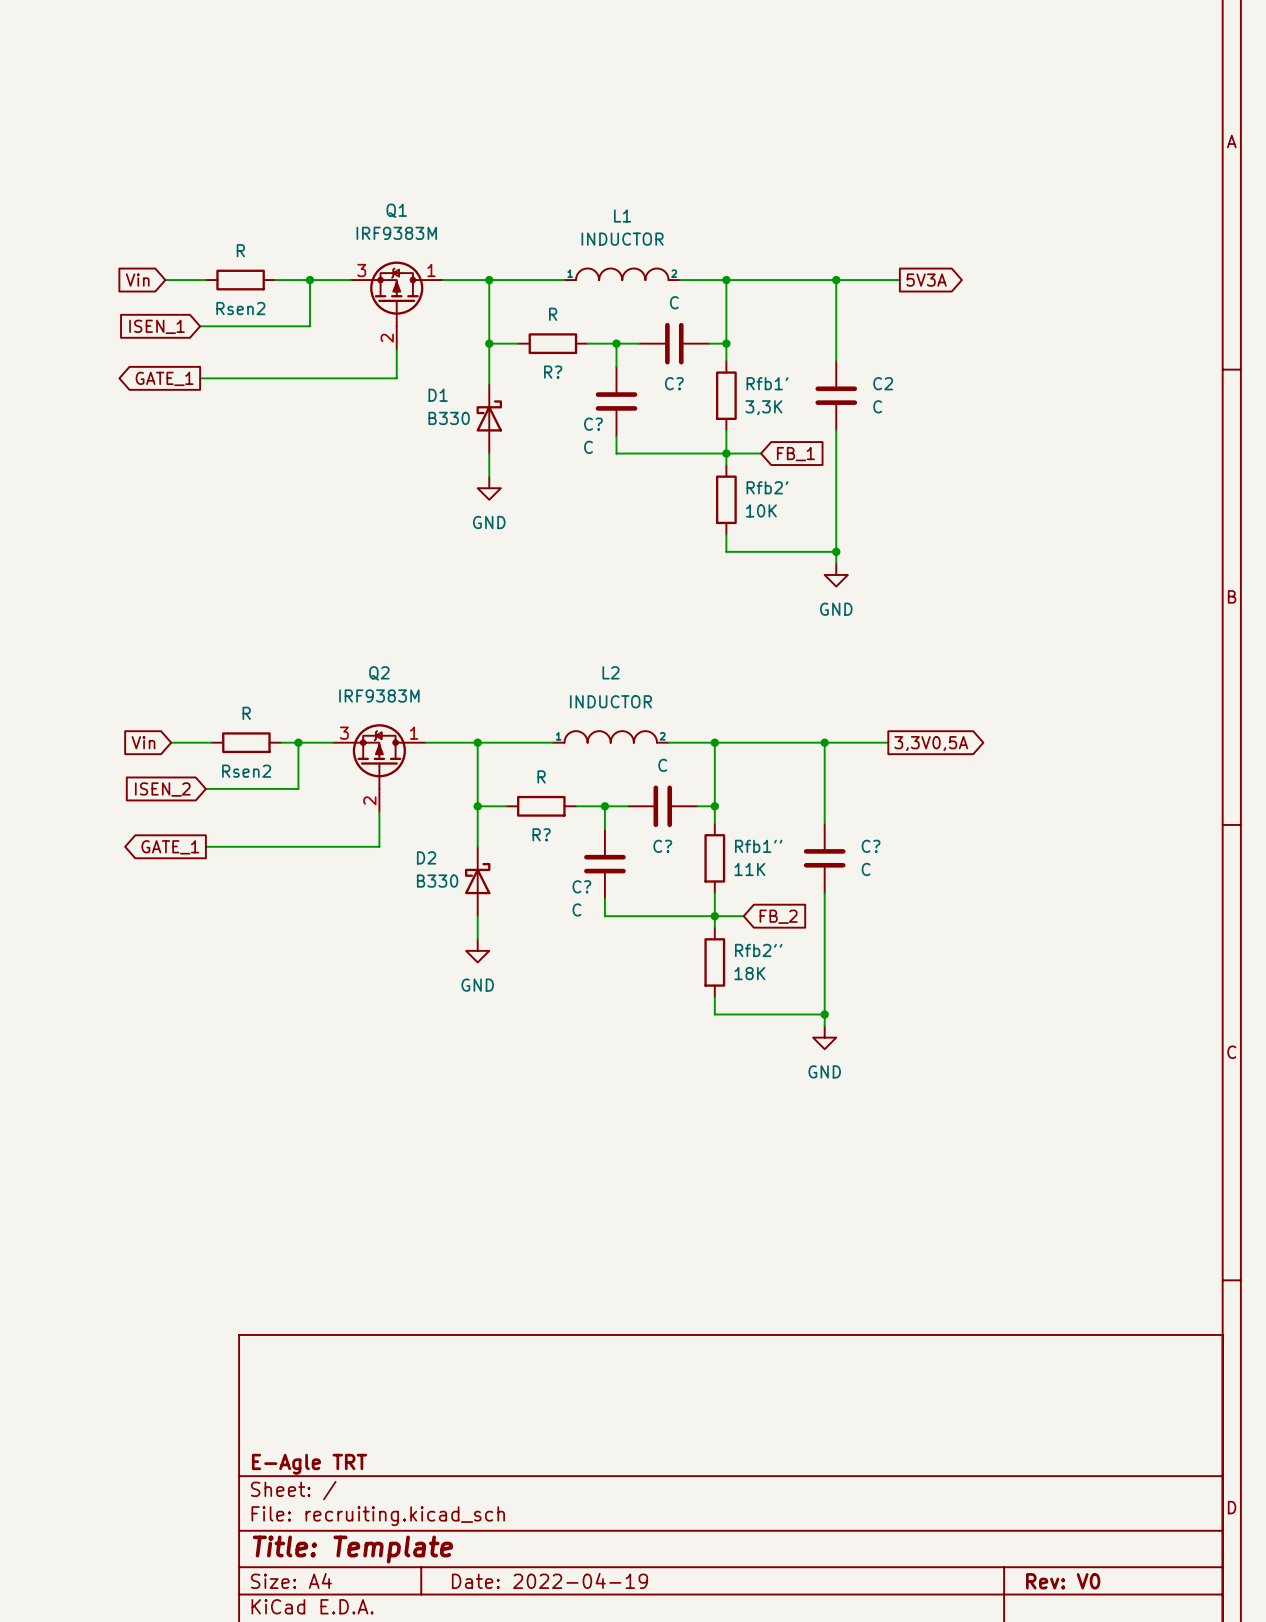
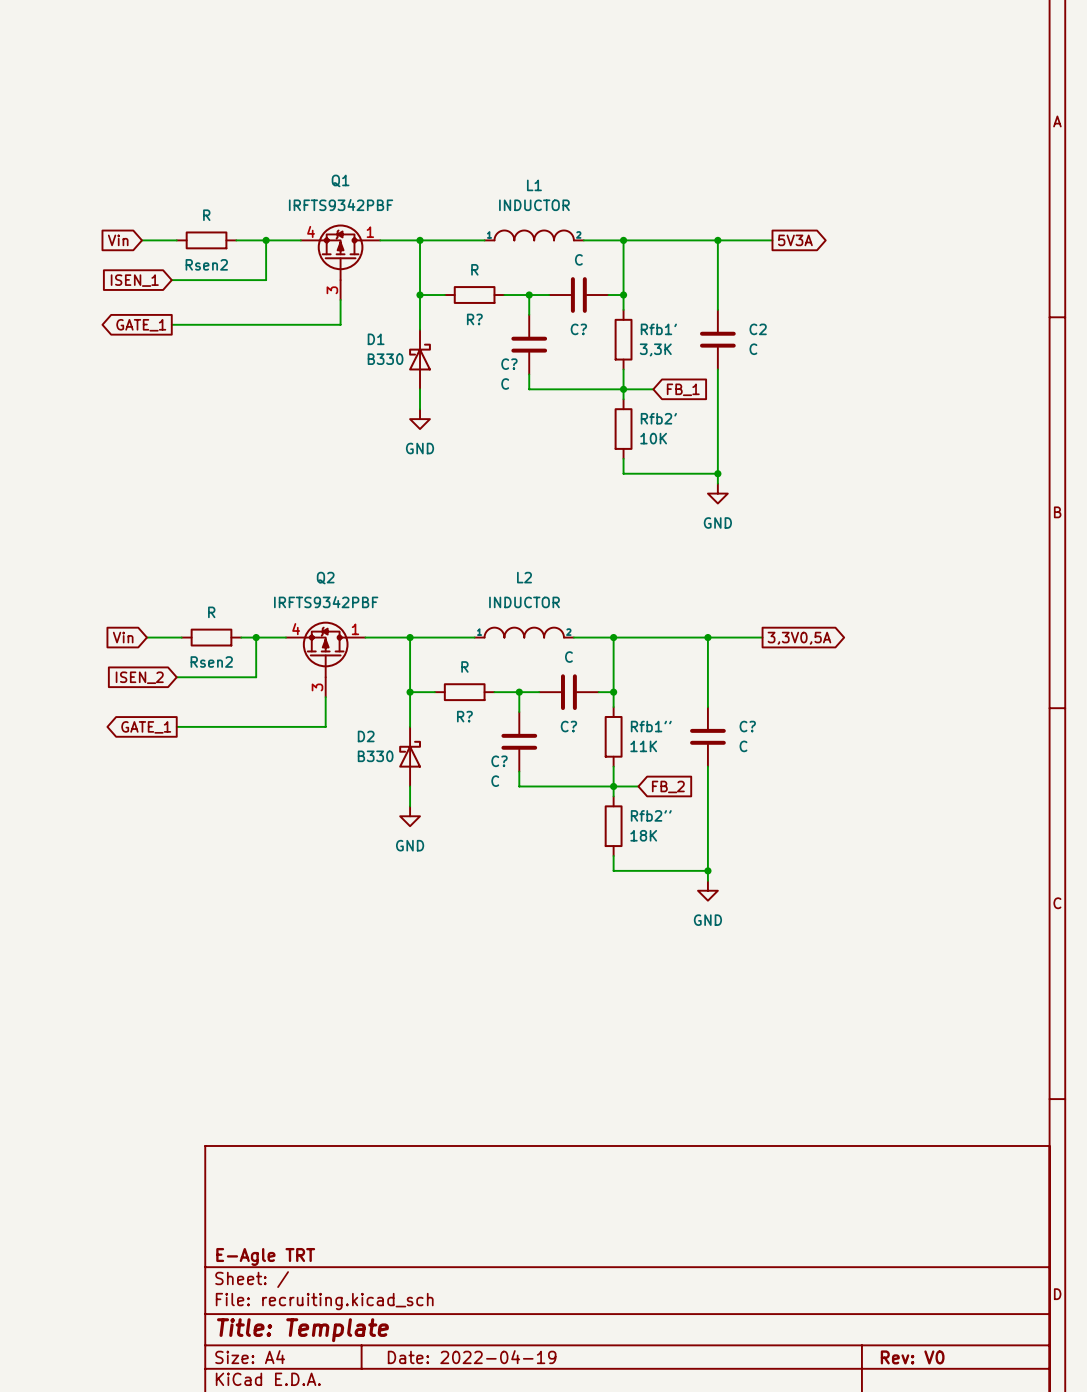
Q1 value: IRF9383M (396, 233) -> IRFTS9342PBF (341, 205)
Q1 pin number: 3 (361, 270) -> 4 (311, 231)
Q1 pin number: 2 (387, 338) -> 3 (332, 290)
Q2 value: IRF9383M (379, 695) -> IRFTS9342PBF (326, 602)
Q2 pin number: 3 (344, 733) -> 4 (296, 629)
Q2 pin number: 2 (369, 800) -> 3 (317, 687)

